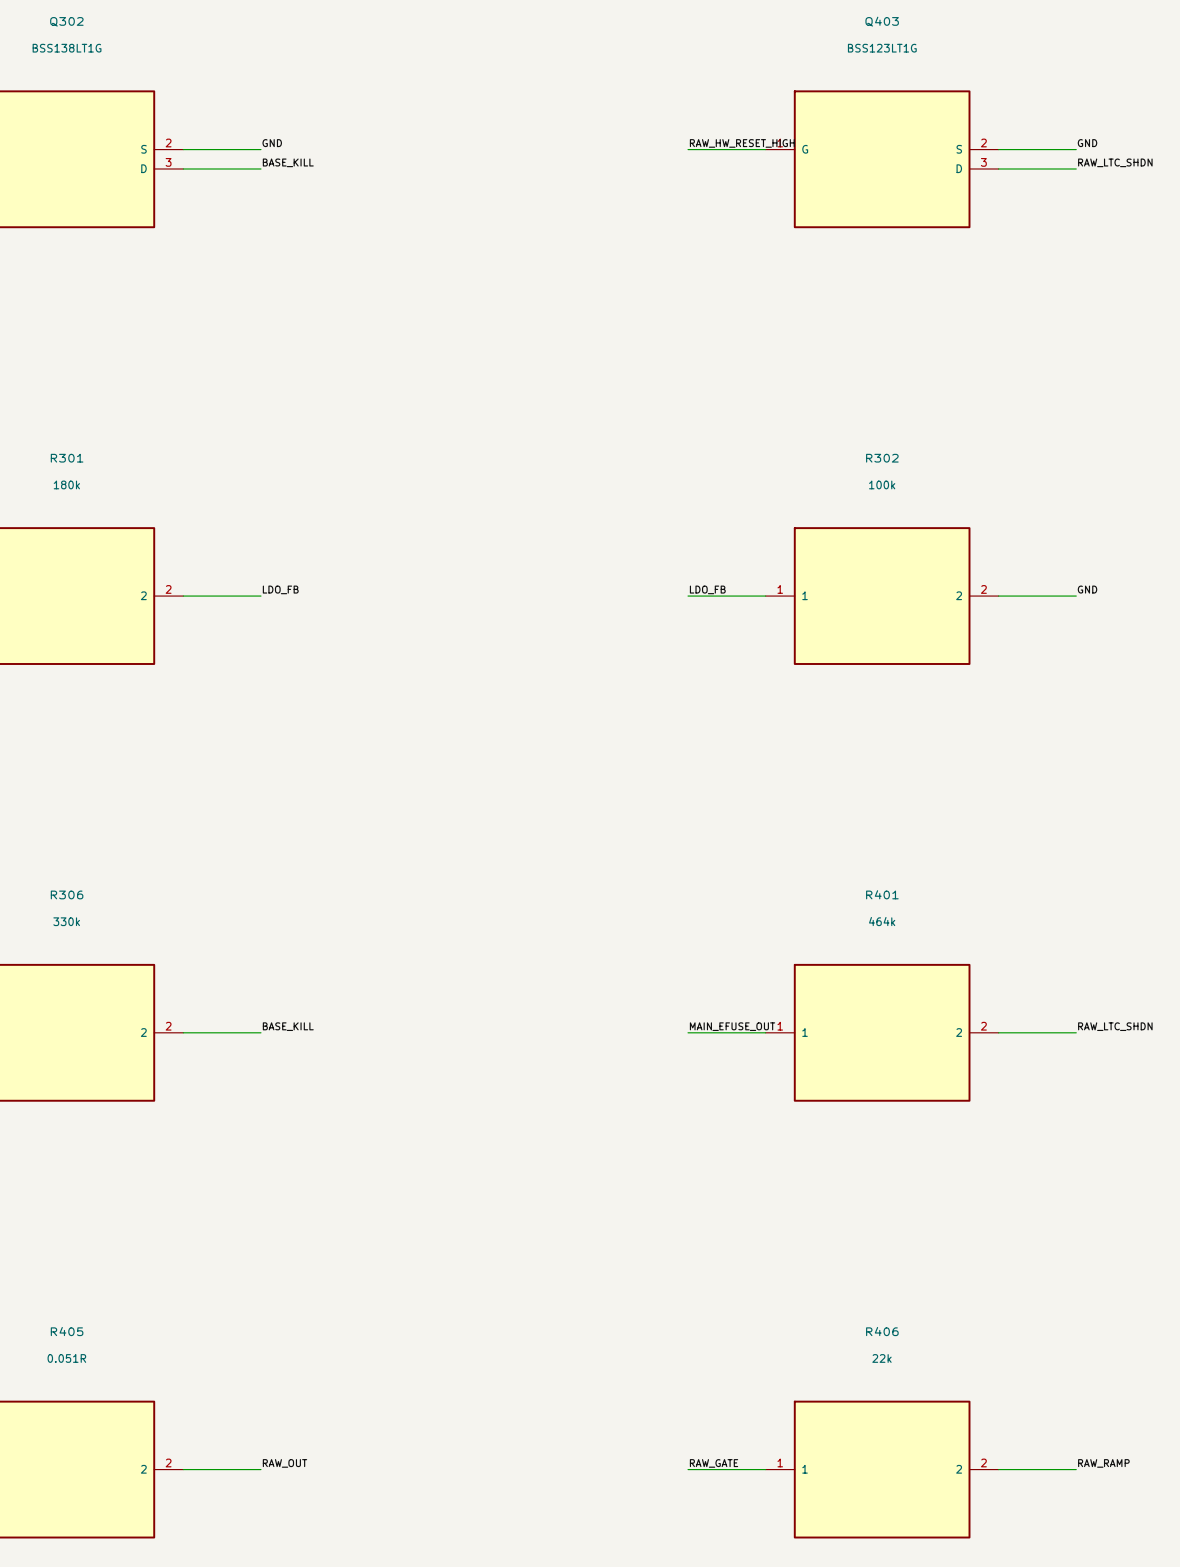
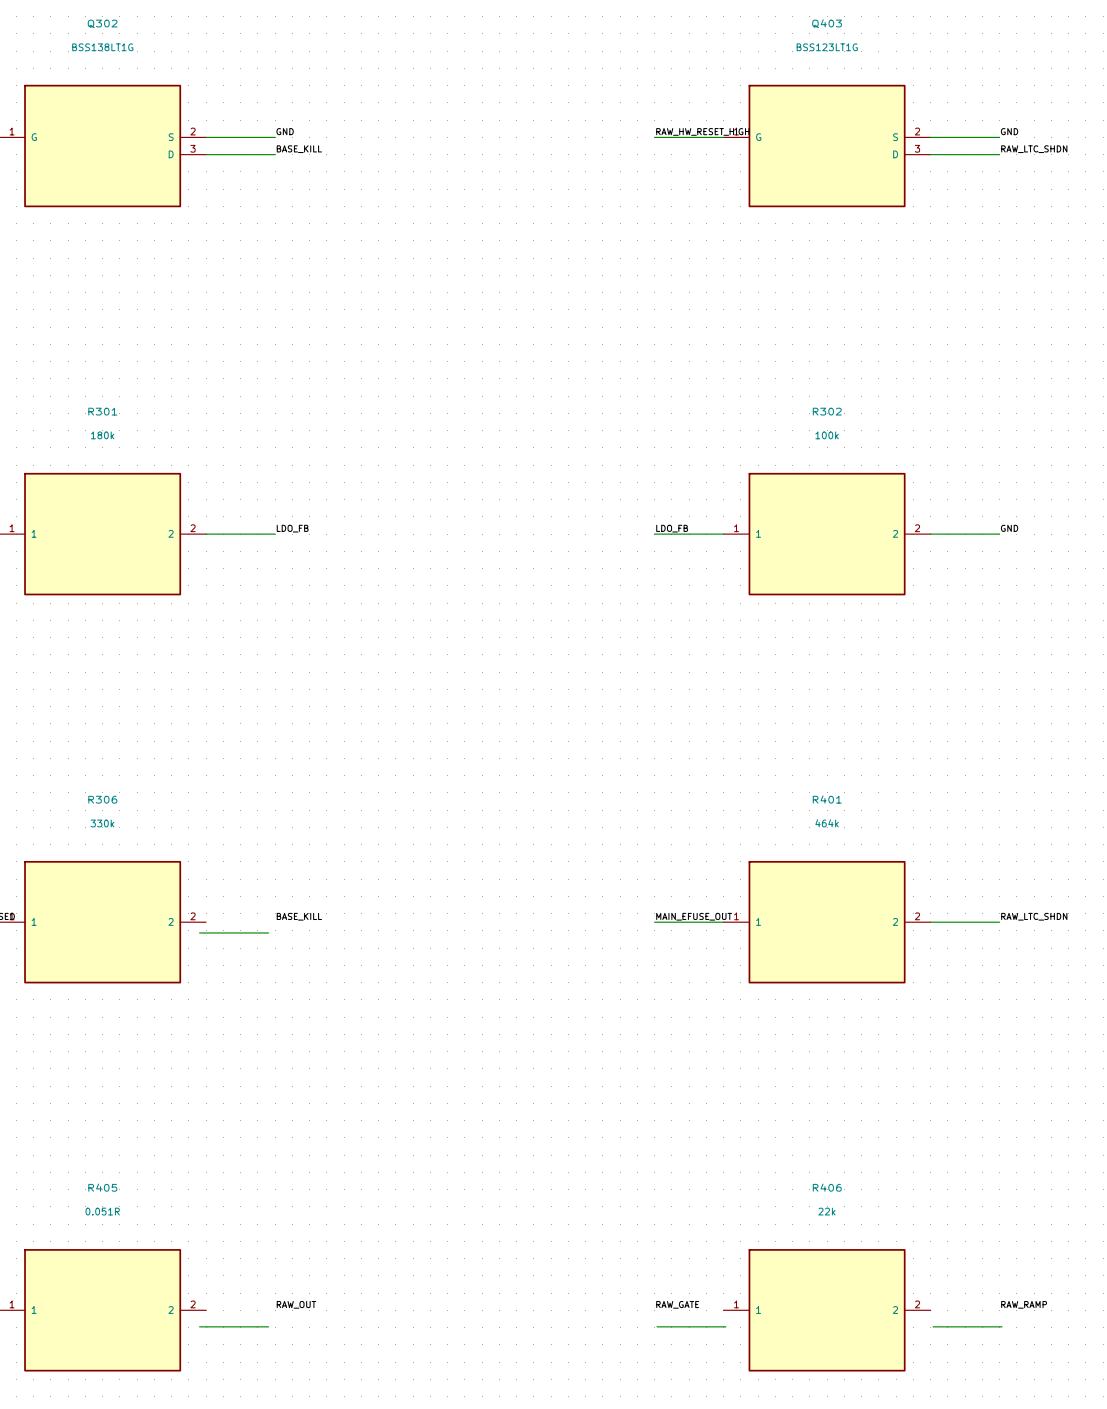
wire: (183, 1032) (260, 1032) -> (199, 932) (268, 932)
wire: (183, 1469) (260, 1469) -> (199, 1326) (268, 1326)
wire: (688, 1469) (765, 1469) -> (657, 1326) (726, 1326)
wire: (998, 1469) (1076, 1469) -> (933, 1326) (1002, 1326)

